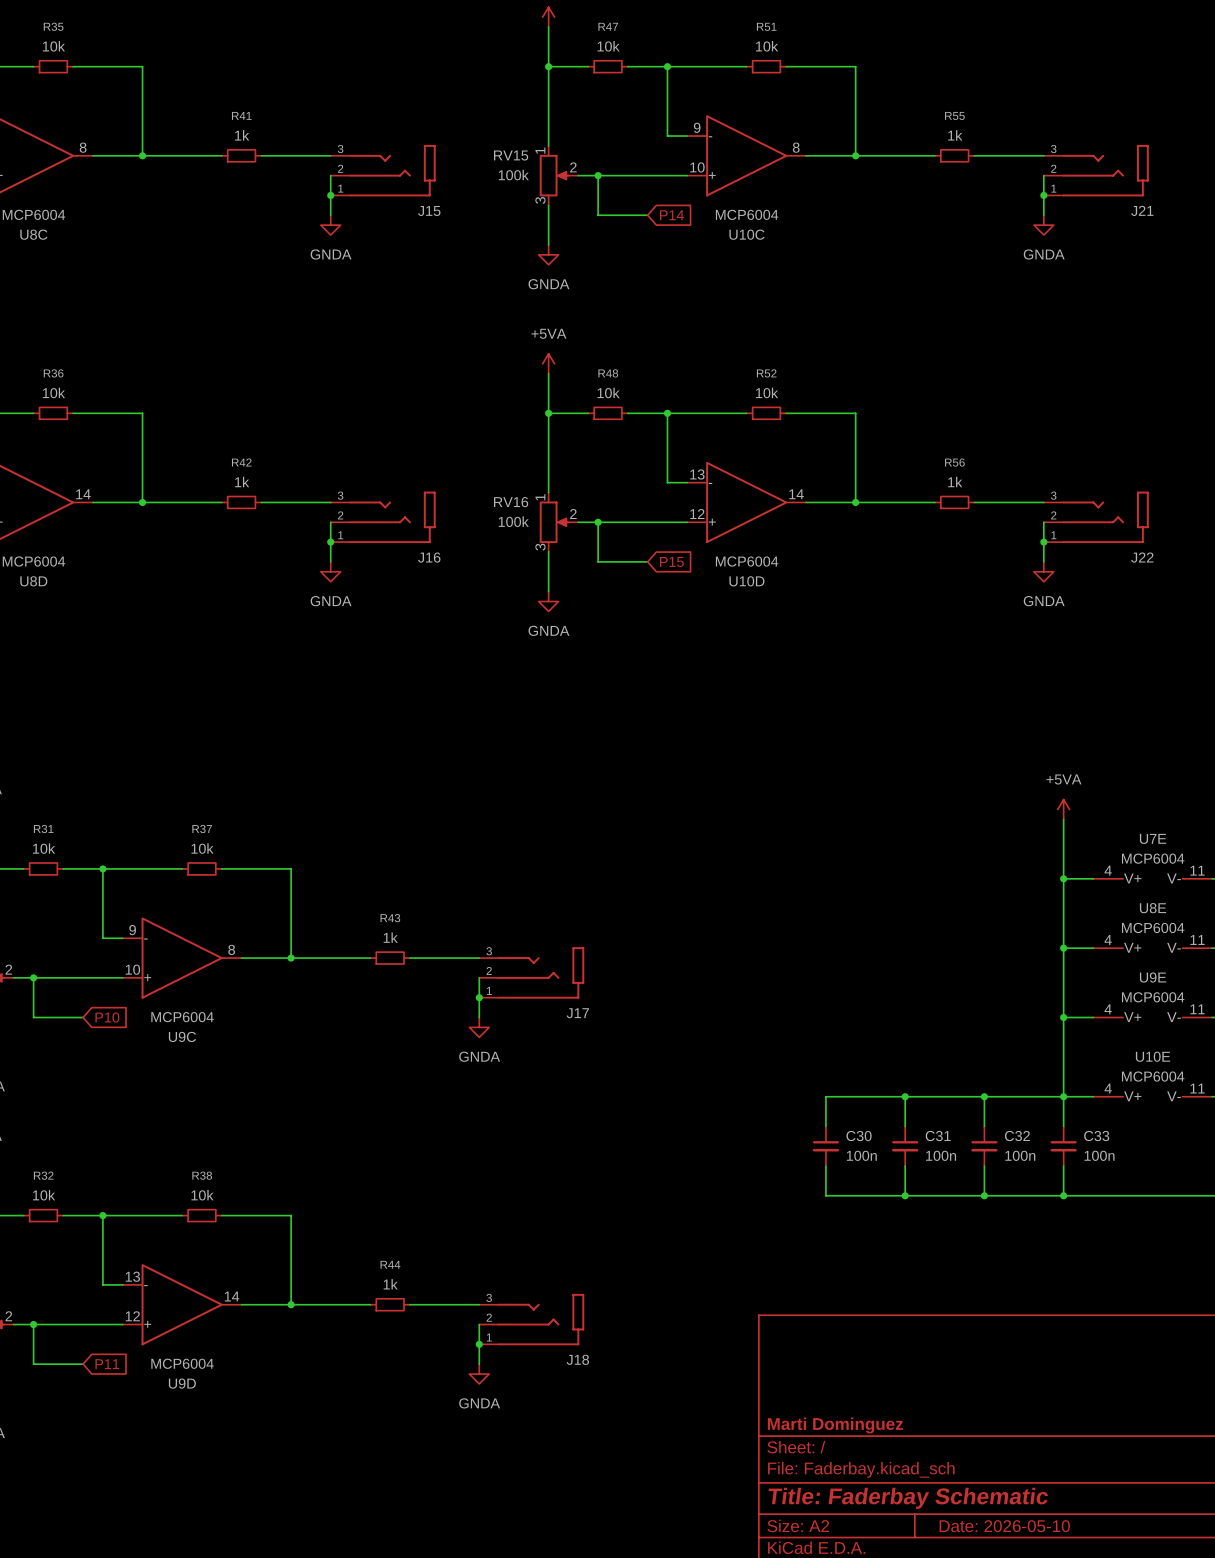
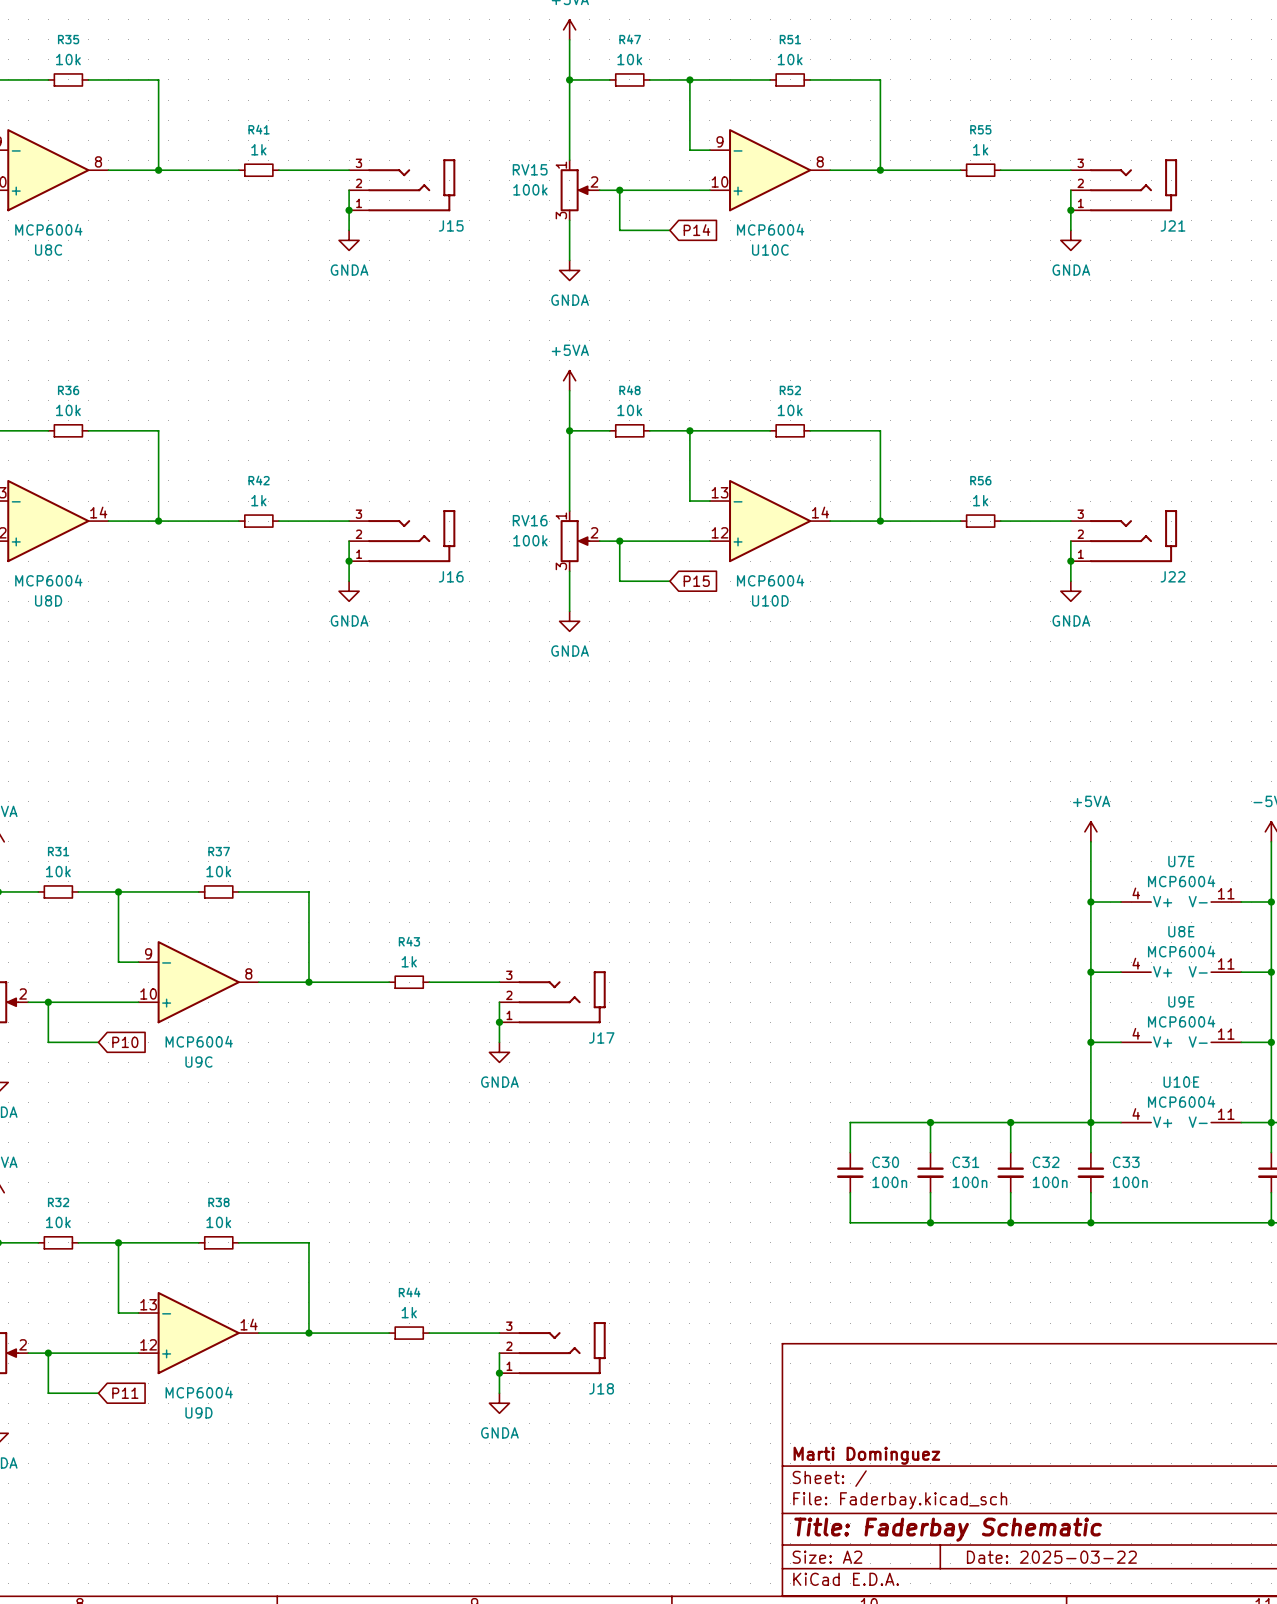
title block: Date: 2026-05-10 (1004, 1526) -> Date: 2025-03-22 (1051, 1557)

